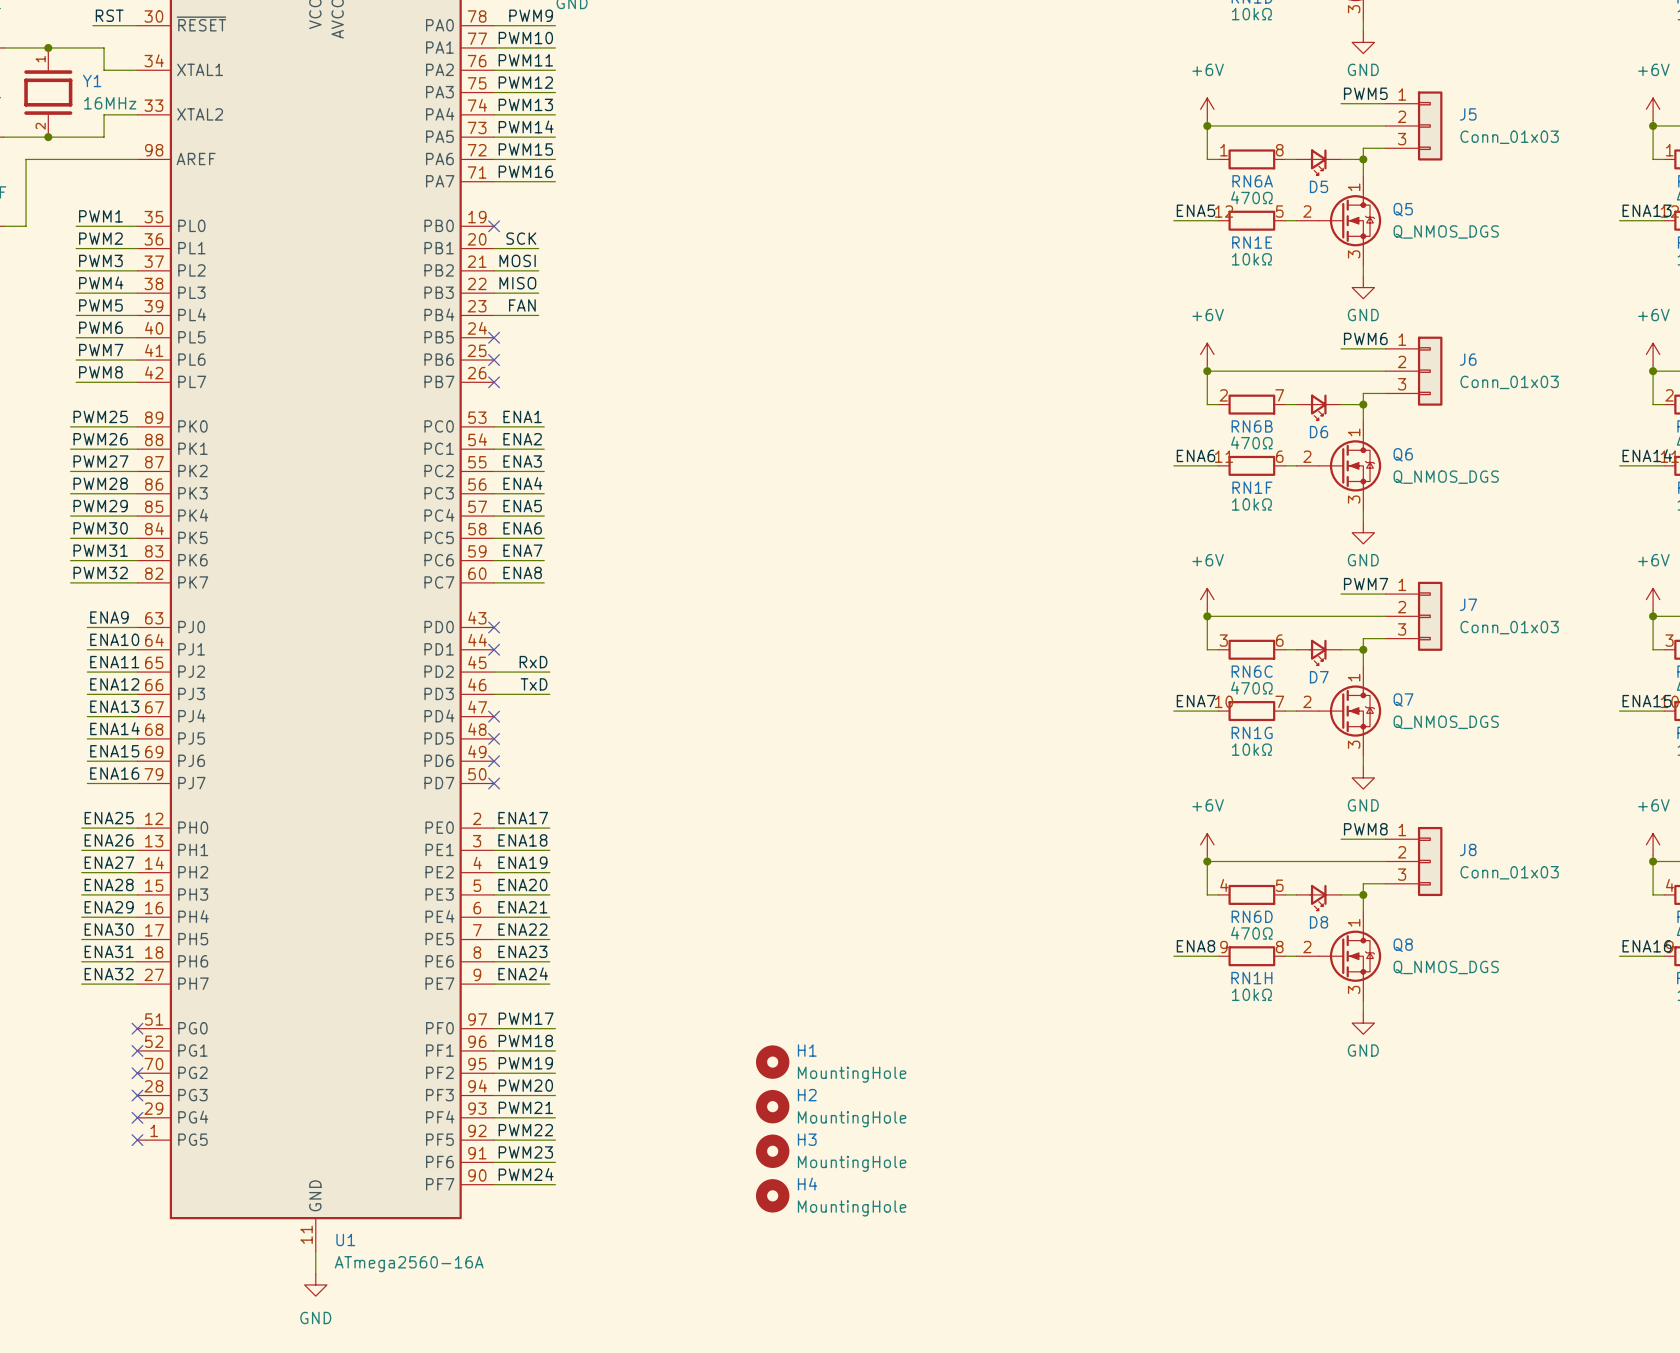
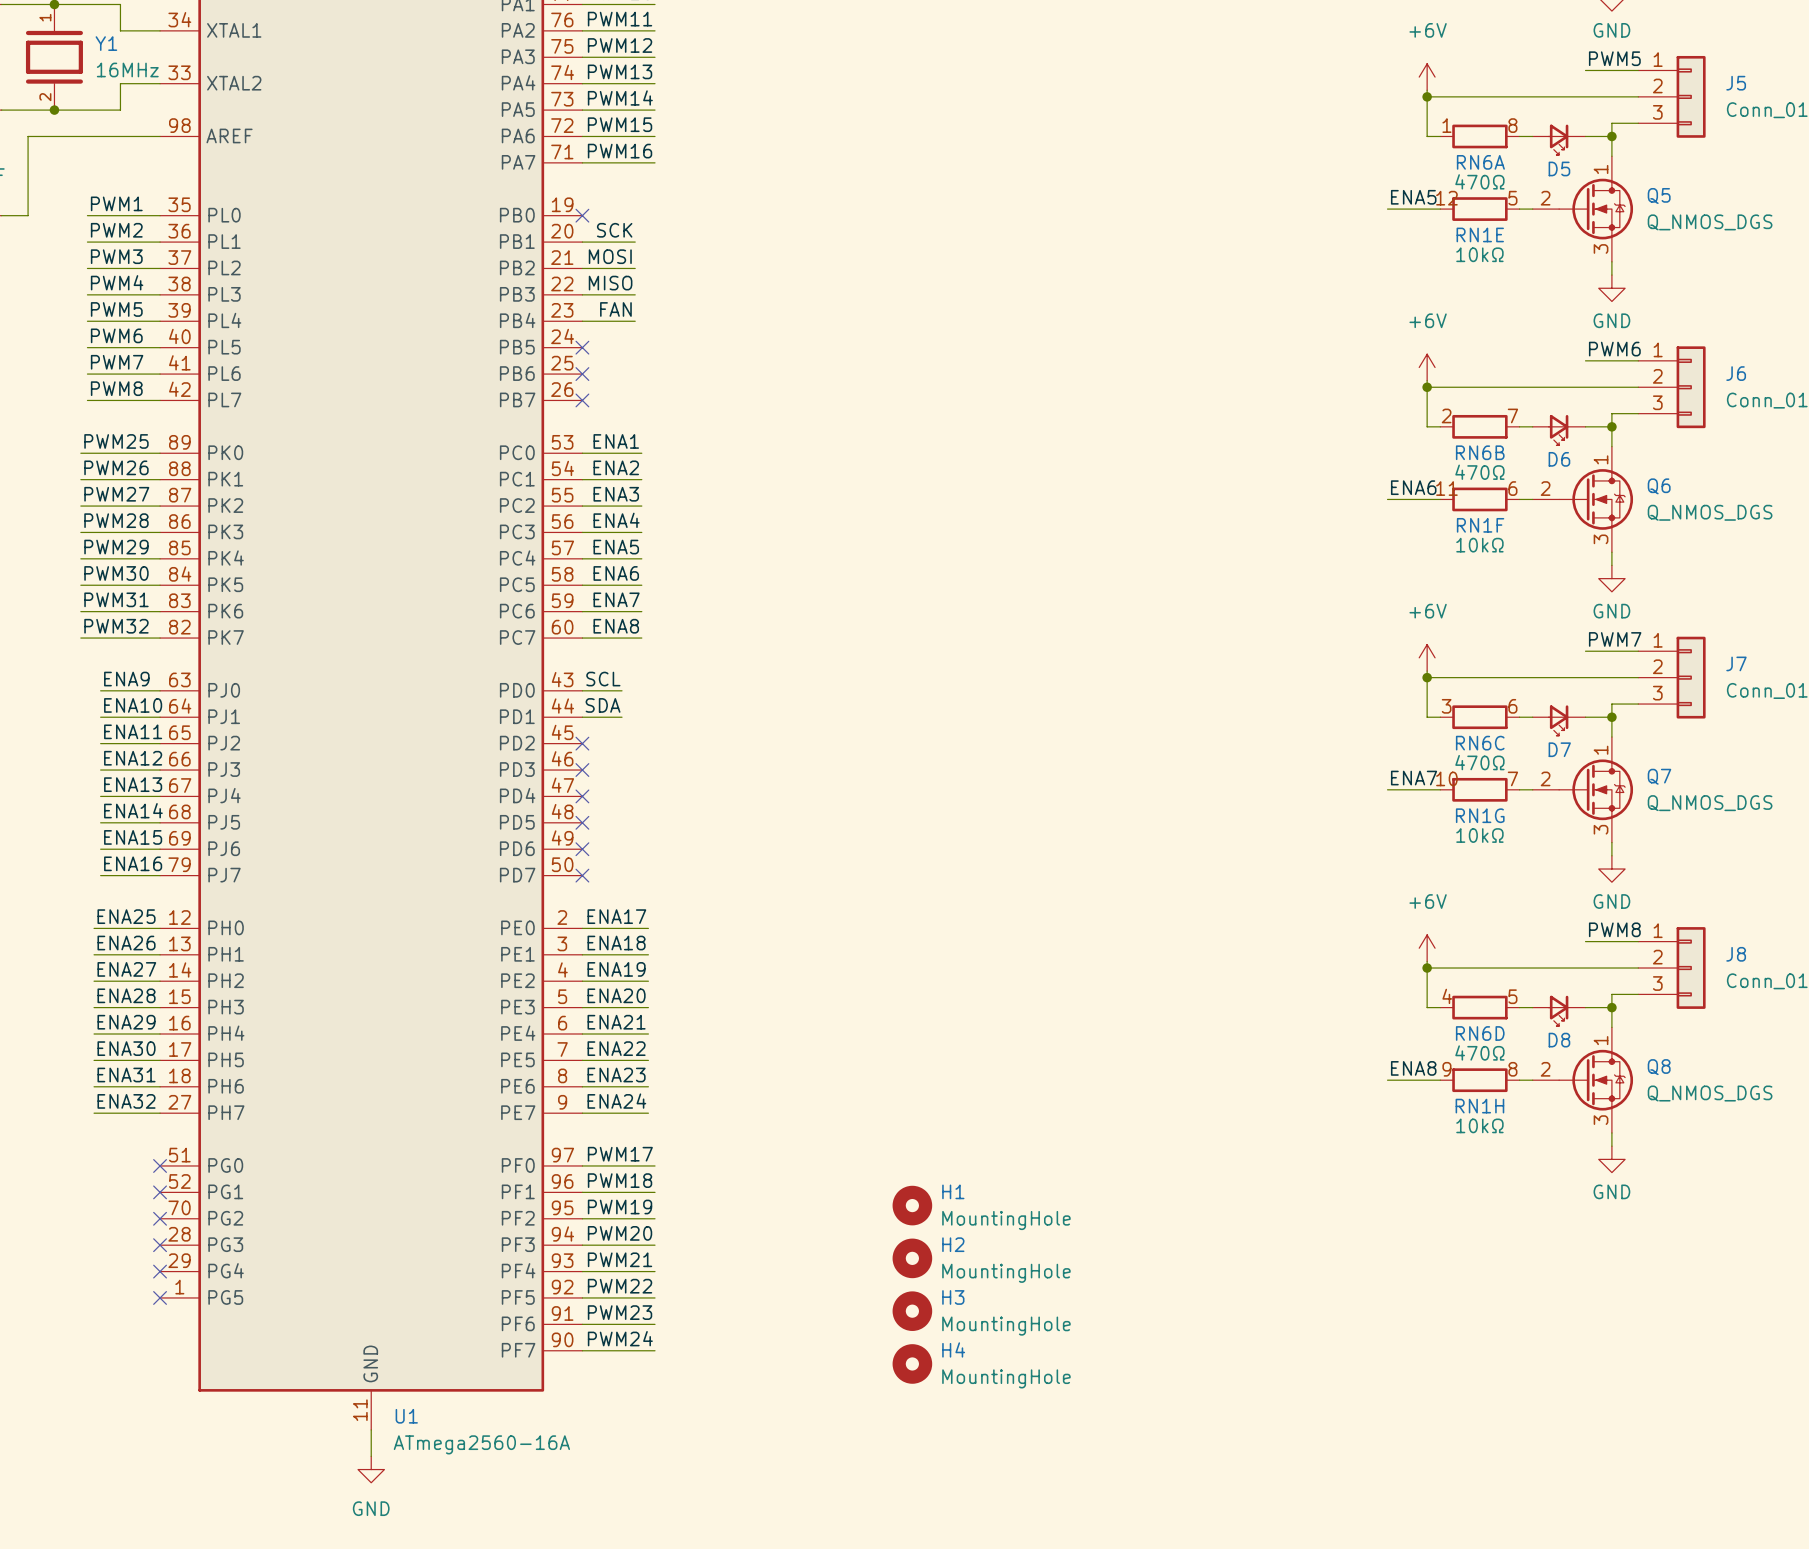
label: none -> SCL (603, 679)
wire: none -> (582, 690) (622, 690)
no-connect mark: (494, 627) -> none
label: none -> SDA (603, 705)
wire: none -> (582, 717) (622, 717)
no-connect mark: (494, 649) -> none
label: RxD (533, 662) -> none
wire: (494, 672) (549, 672) -> none
no-connect mark: none -> (582, 743)
label: TxD (534, 684) -> none
wire: (494, 694) (549, 694) -> none
no-connect mark: none -> (582, 770)

